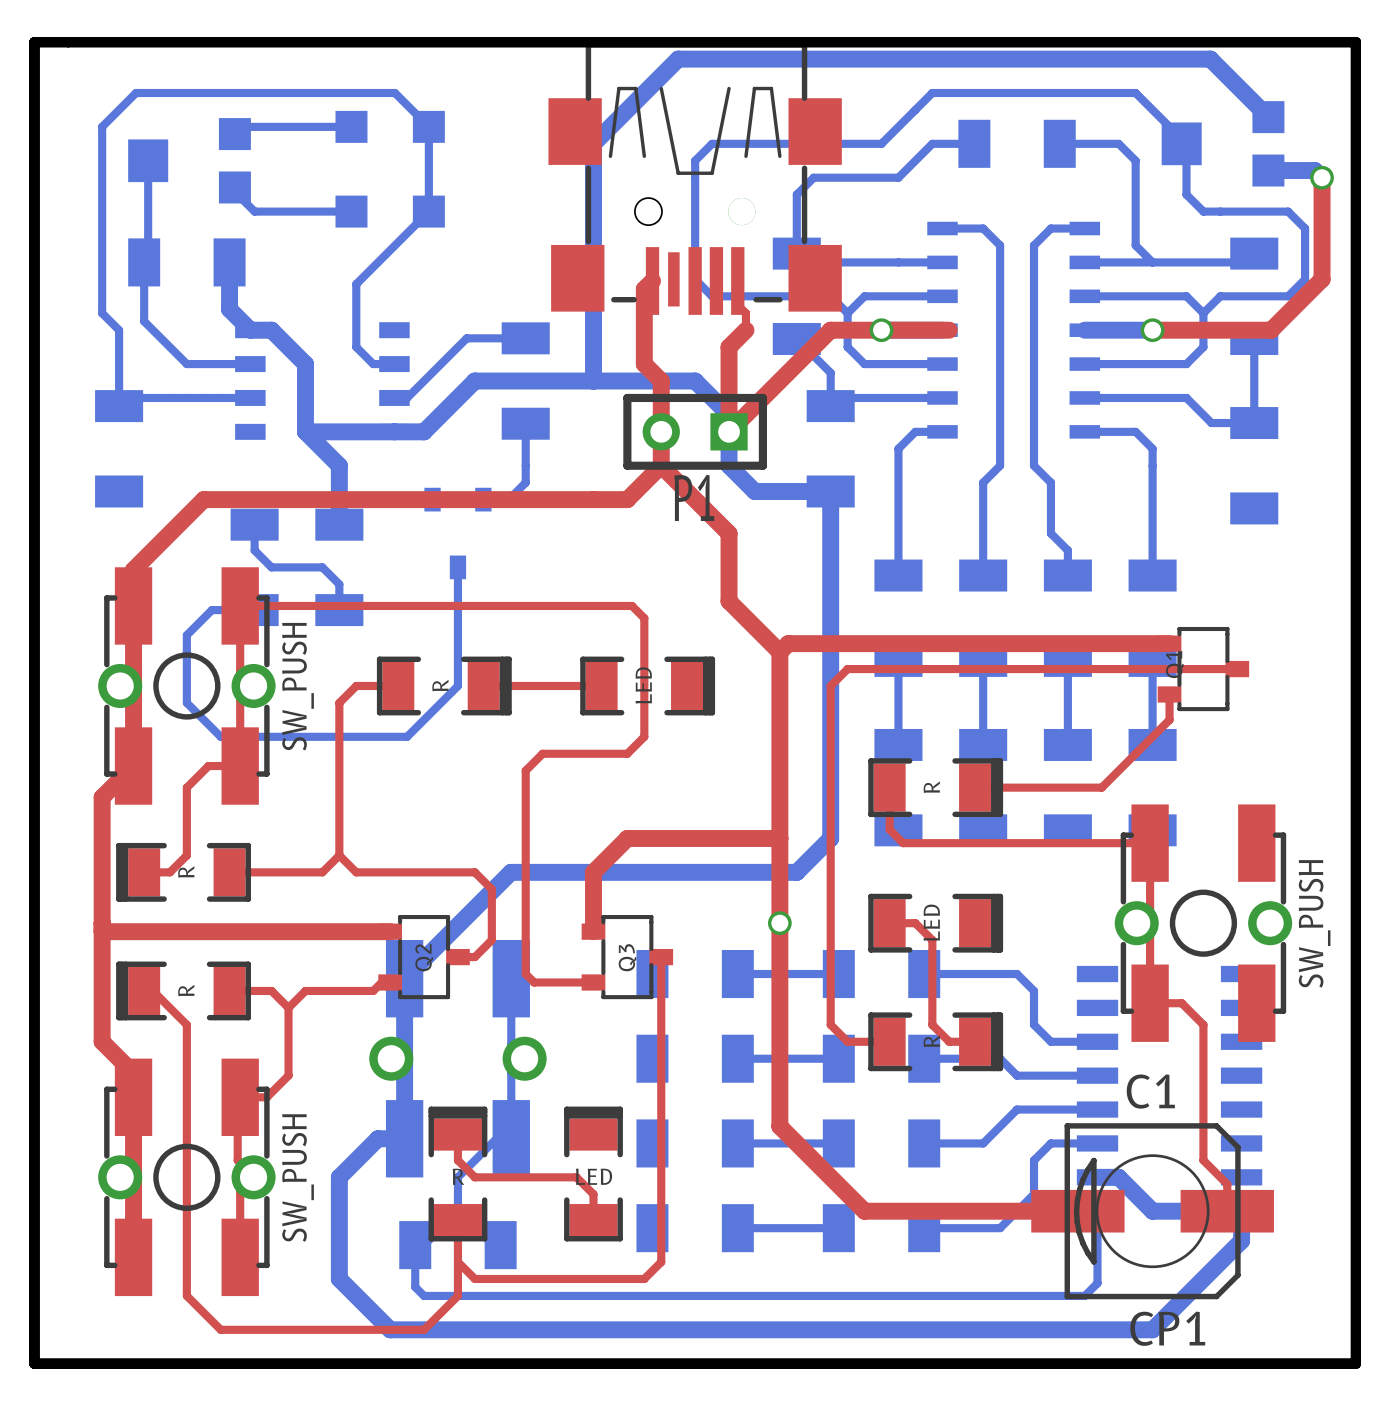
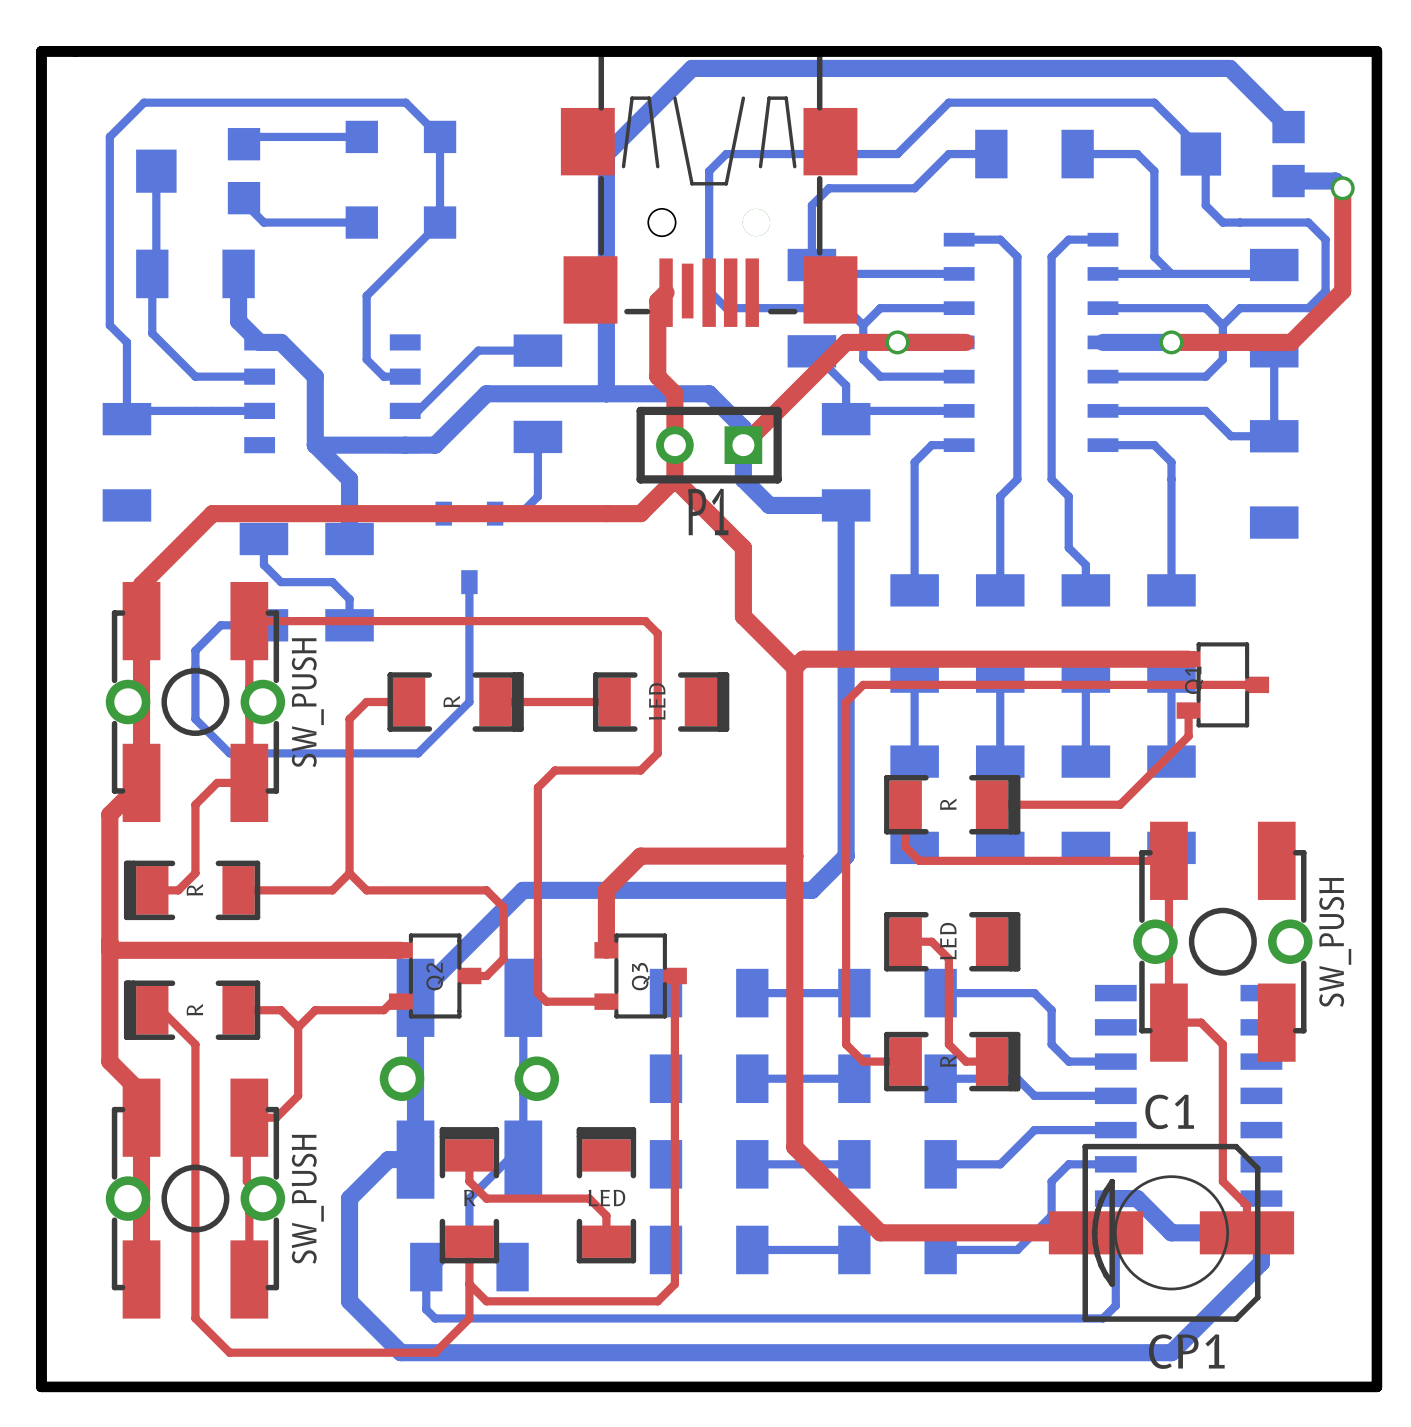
top track: (737, 280) (737, 305) (745, 313) (745, 330) (729, 347) (729, 431) -> none
via: (779, 923) -> none

